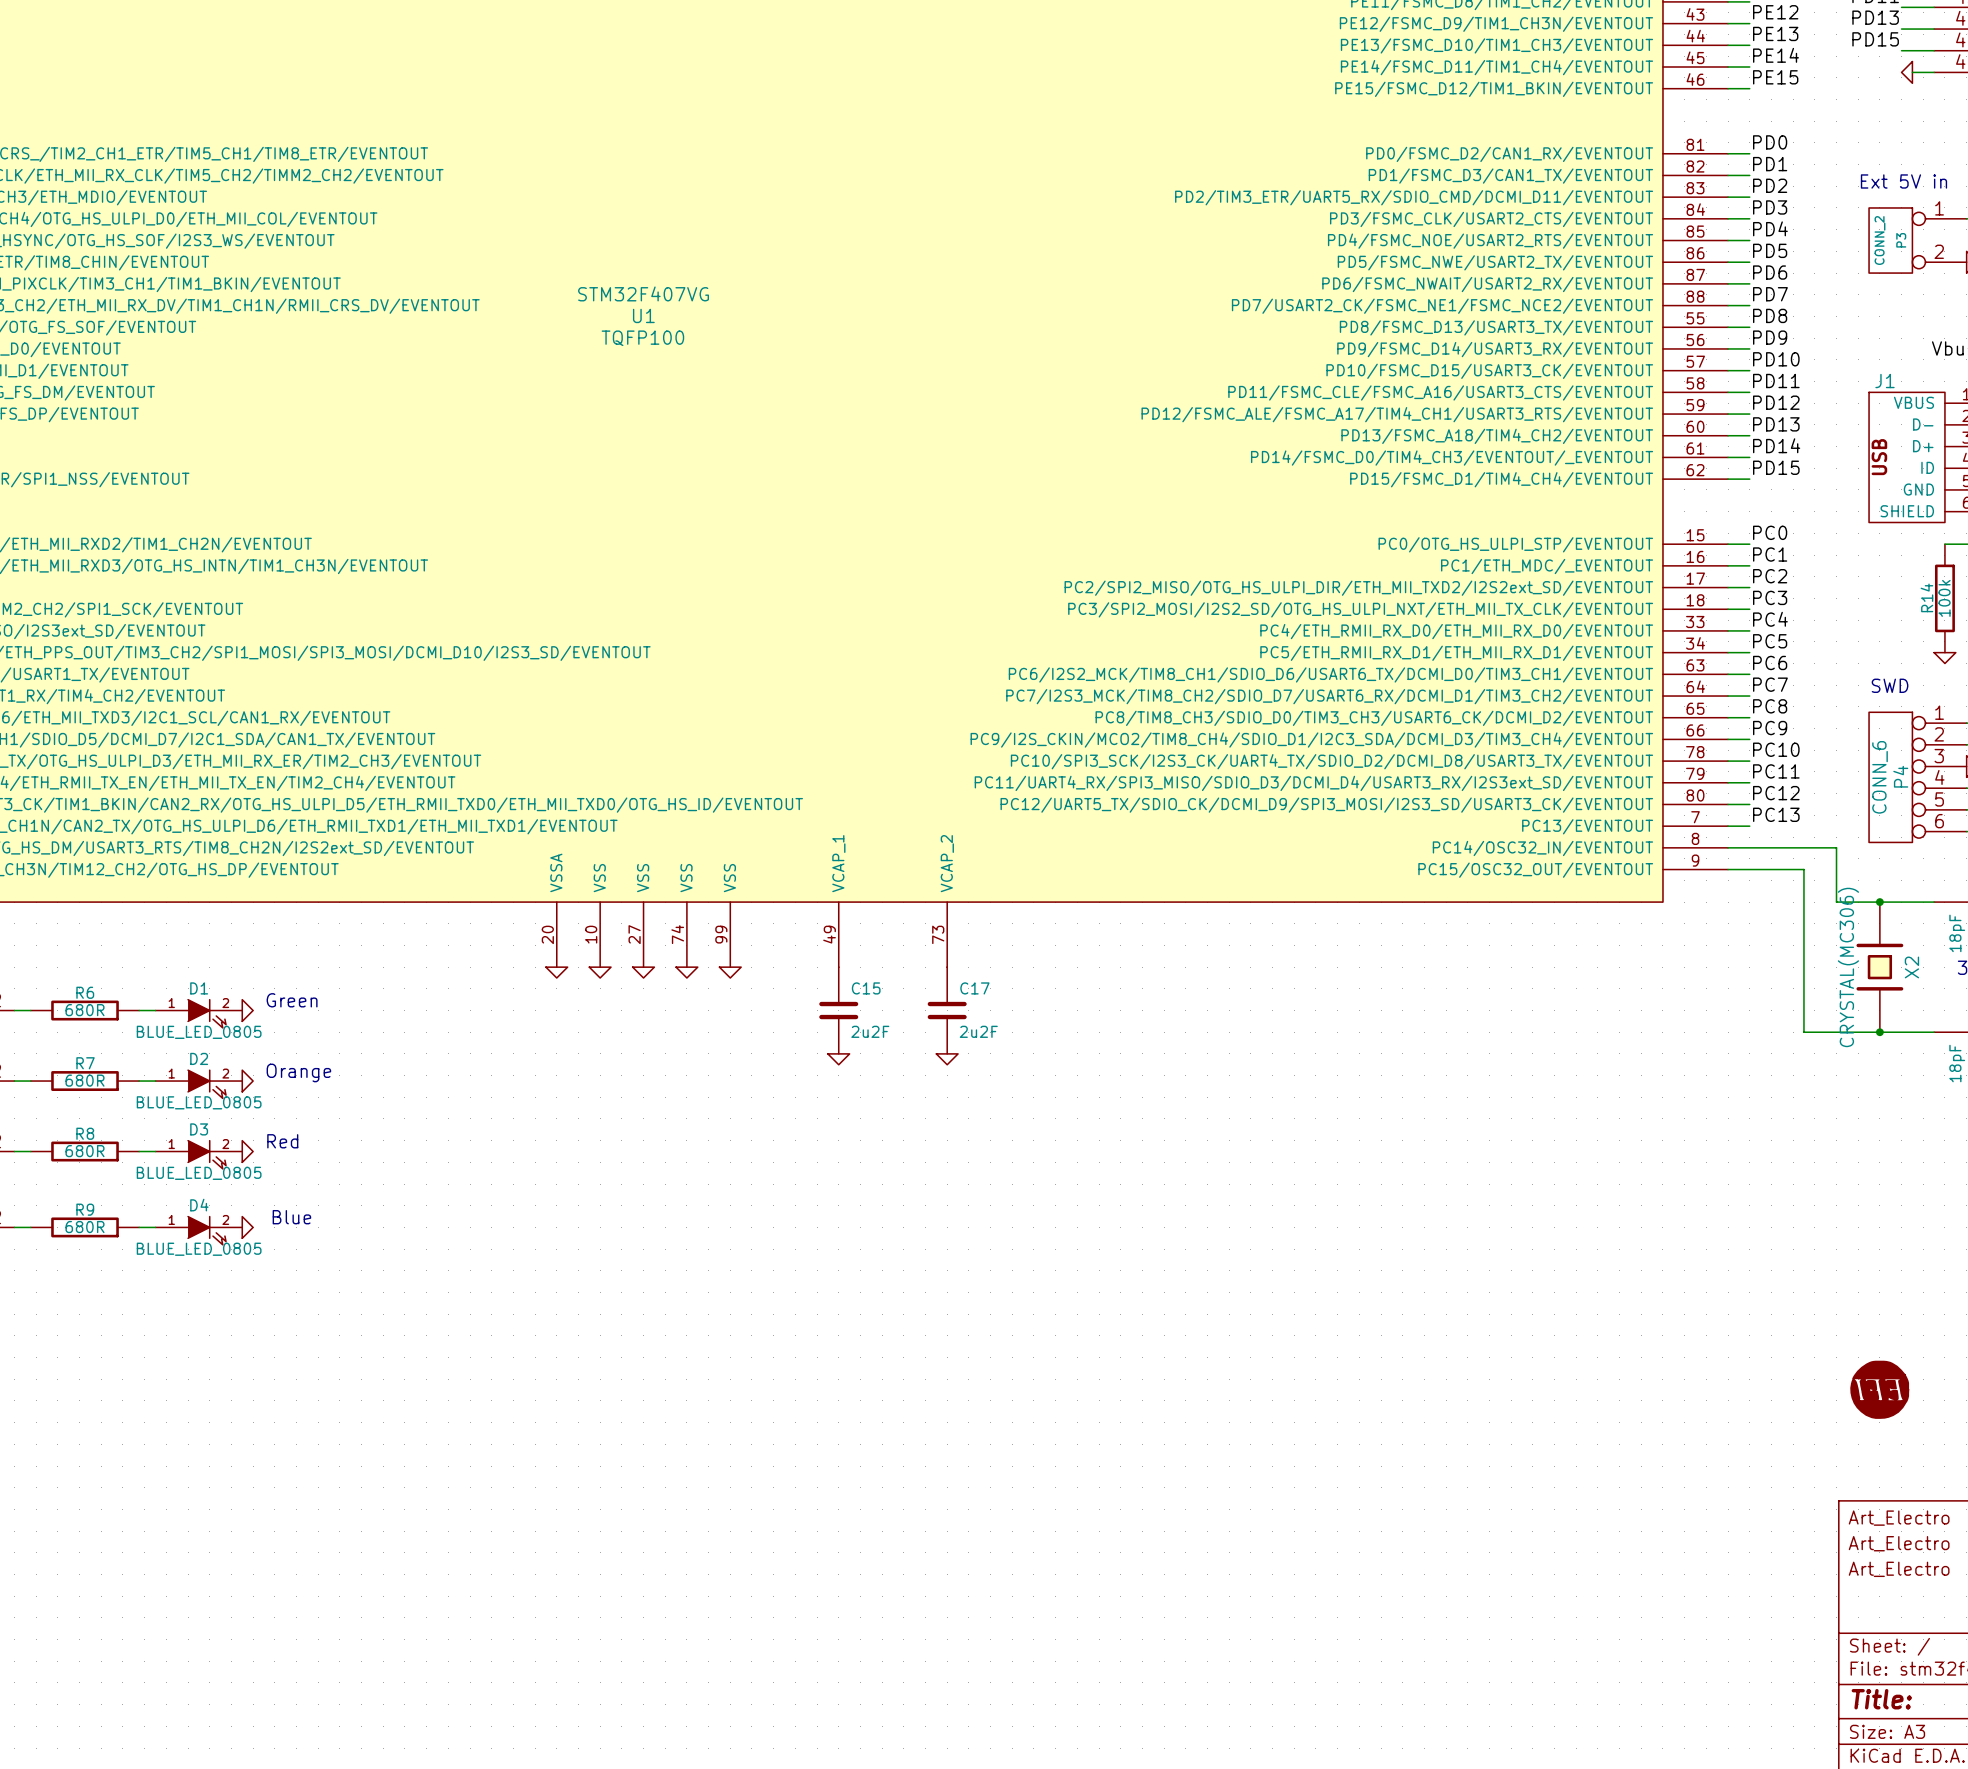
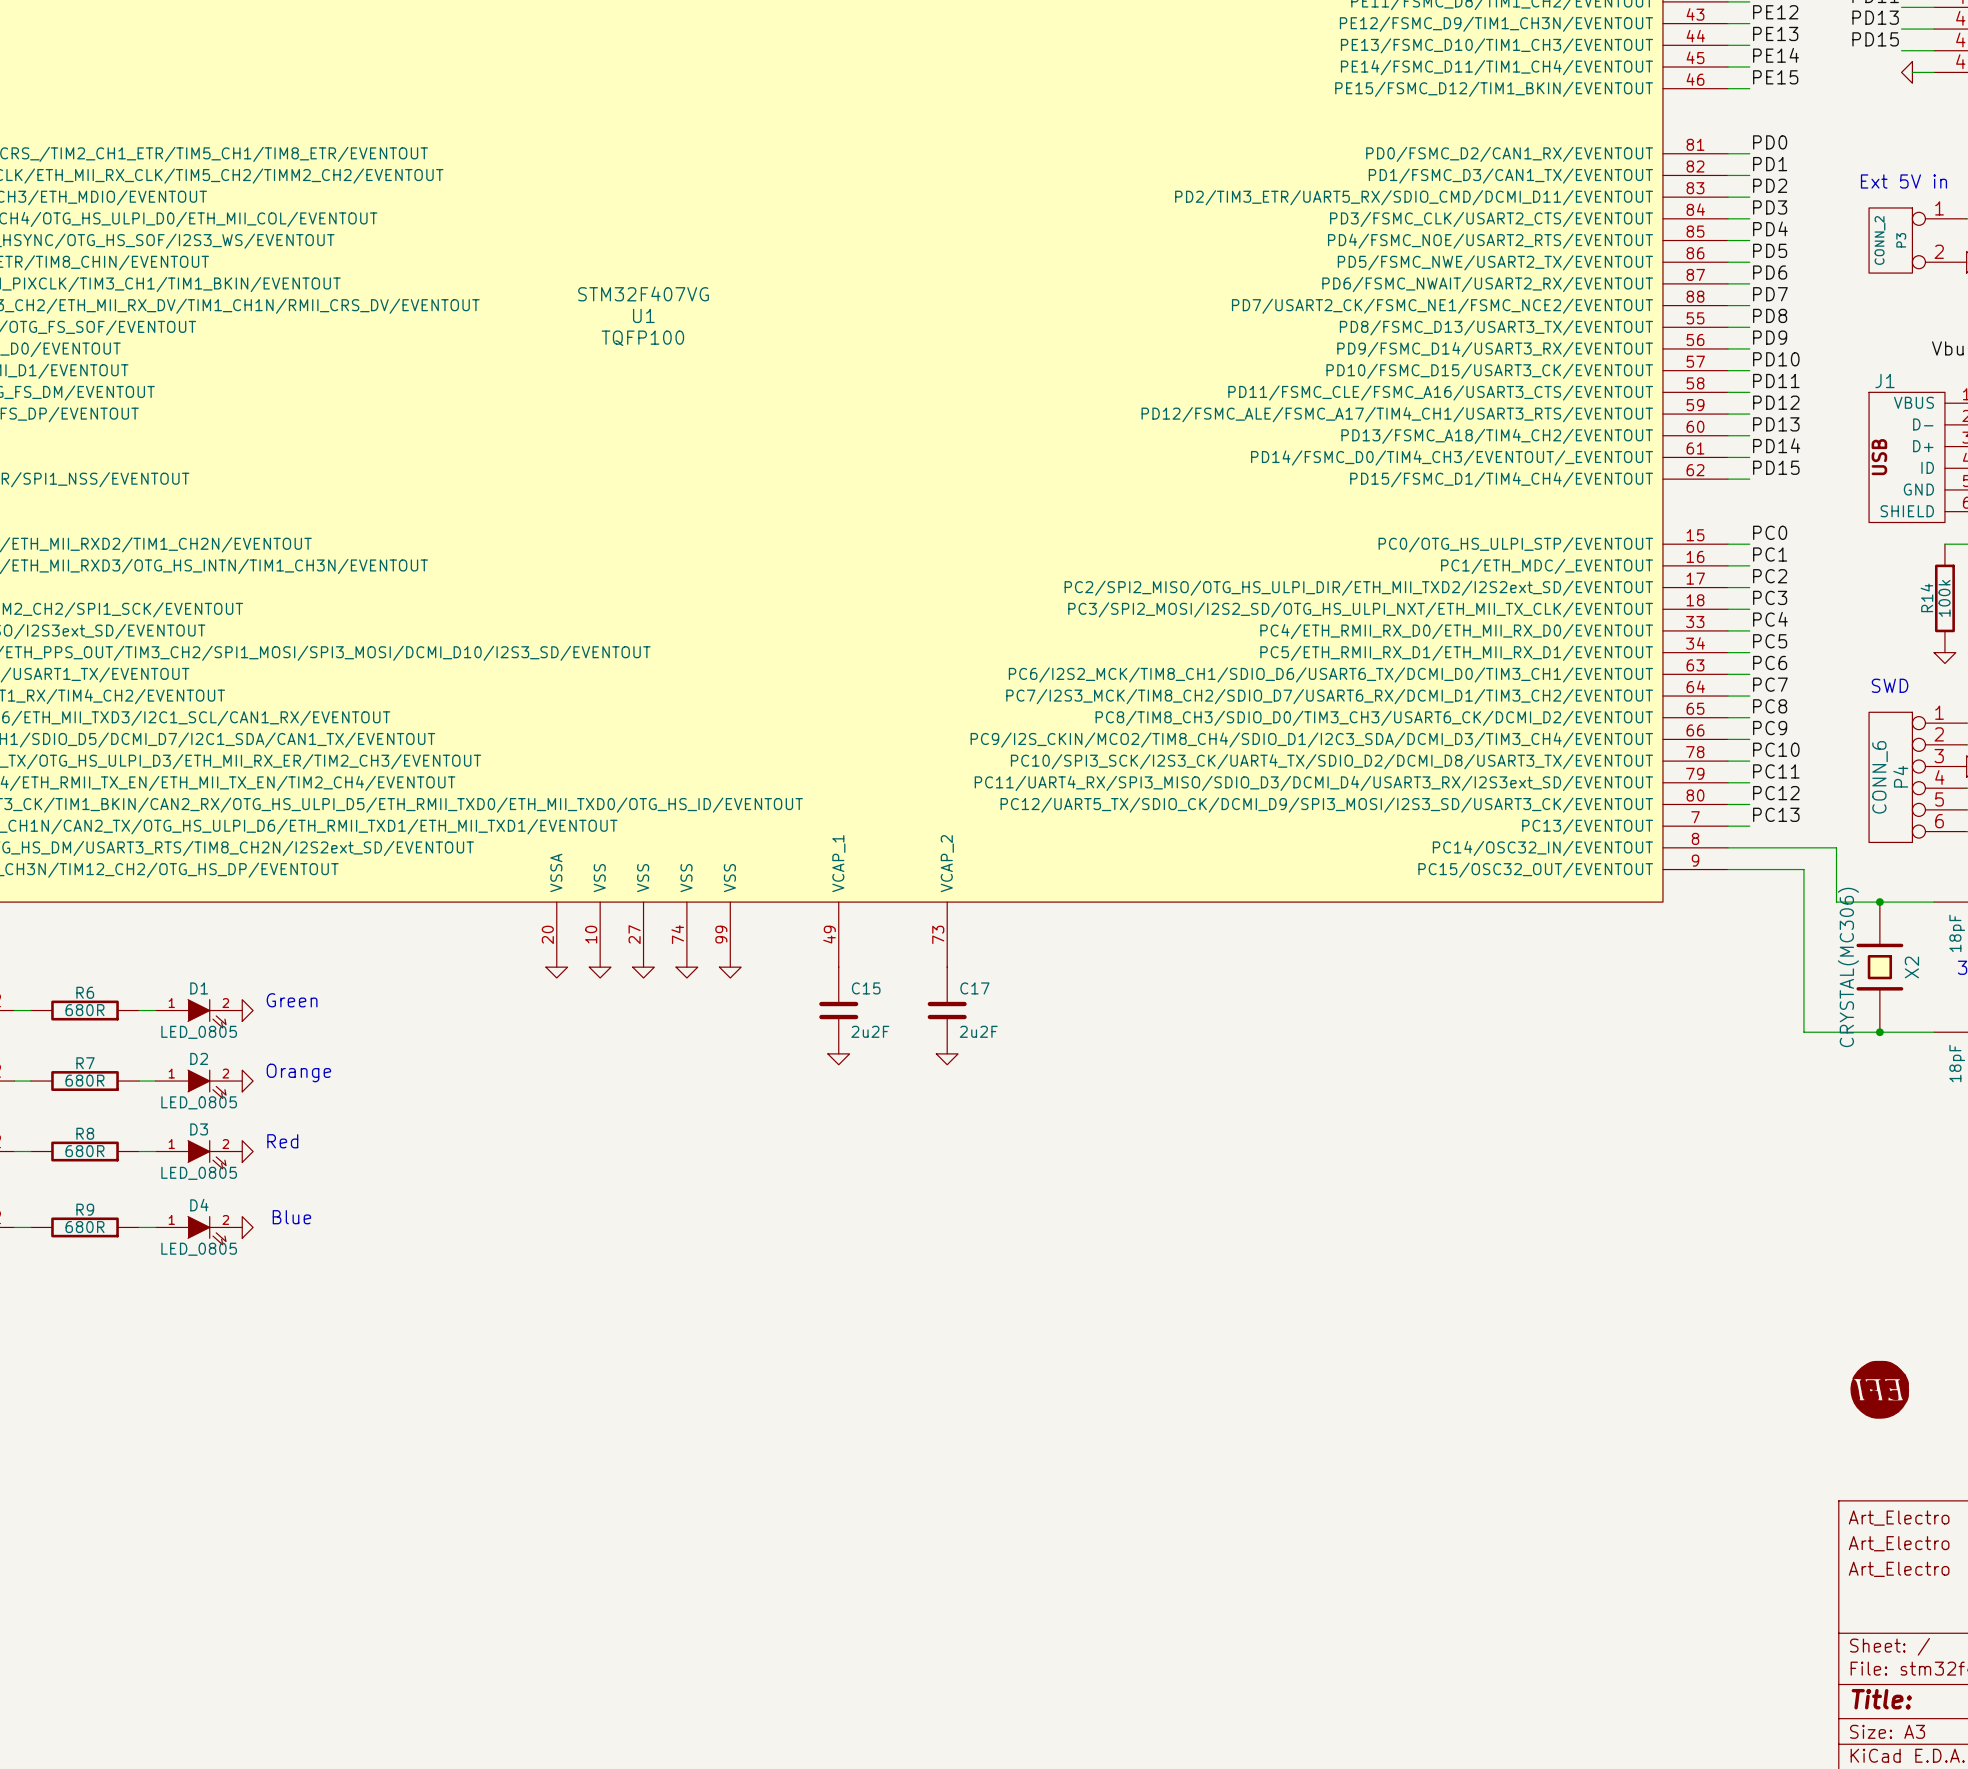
D1 value: BLUE_LED_0805 (199, 1032) -> LED_0805 (199, 1032)
D2 value: BLUE_LED_0805 (199, 1102) -> LED_0805 (199, 1102)
D3 value: BLUE_LED_0805 (199, 1173) -> LED_0805 (199, 1173)
D4 value: BLUE_LED_0805 (199, 1249) -> LED_0805 (199, 1249)

